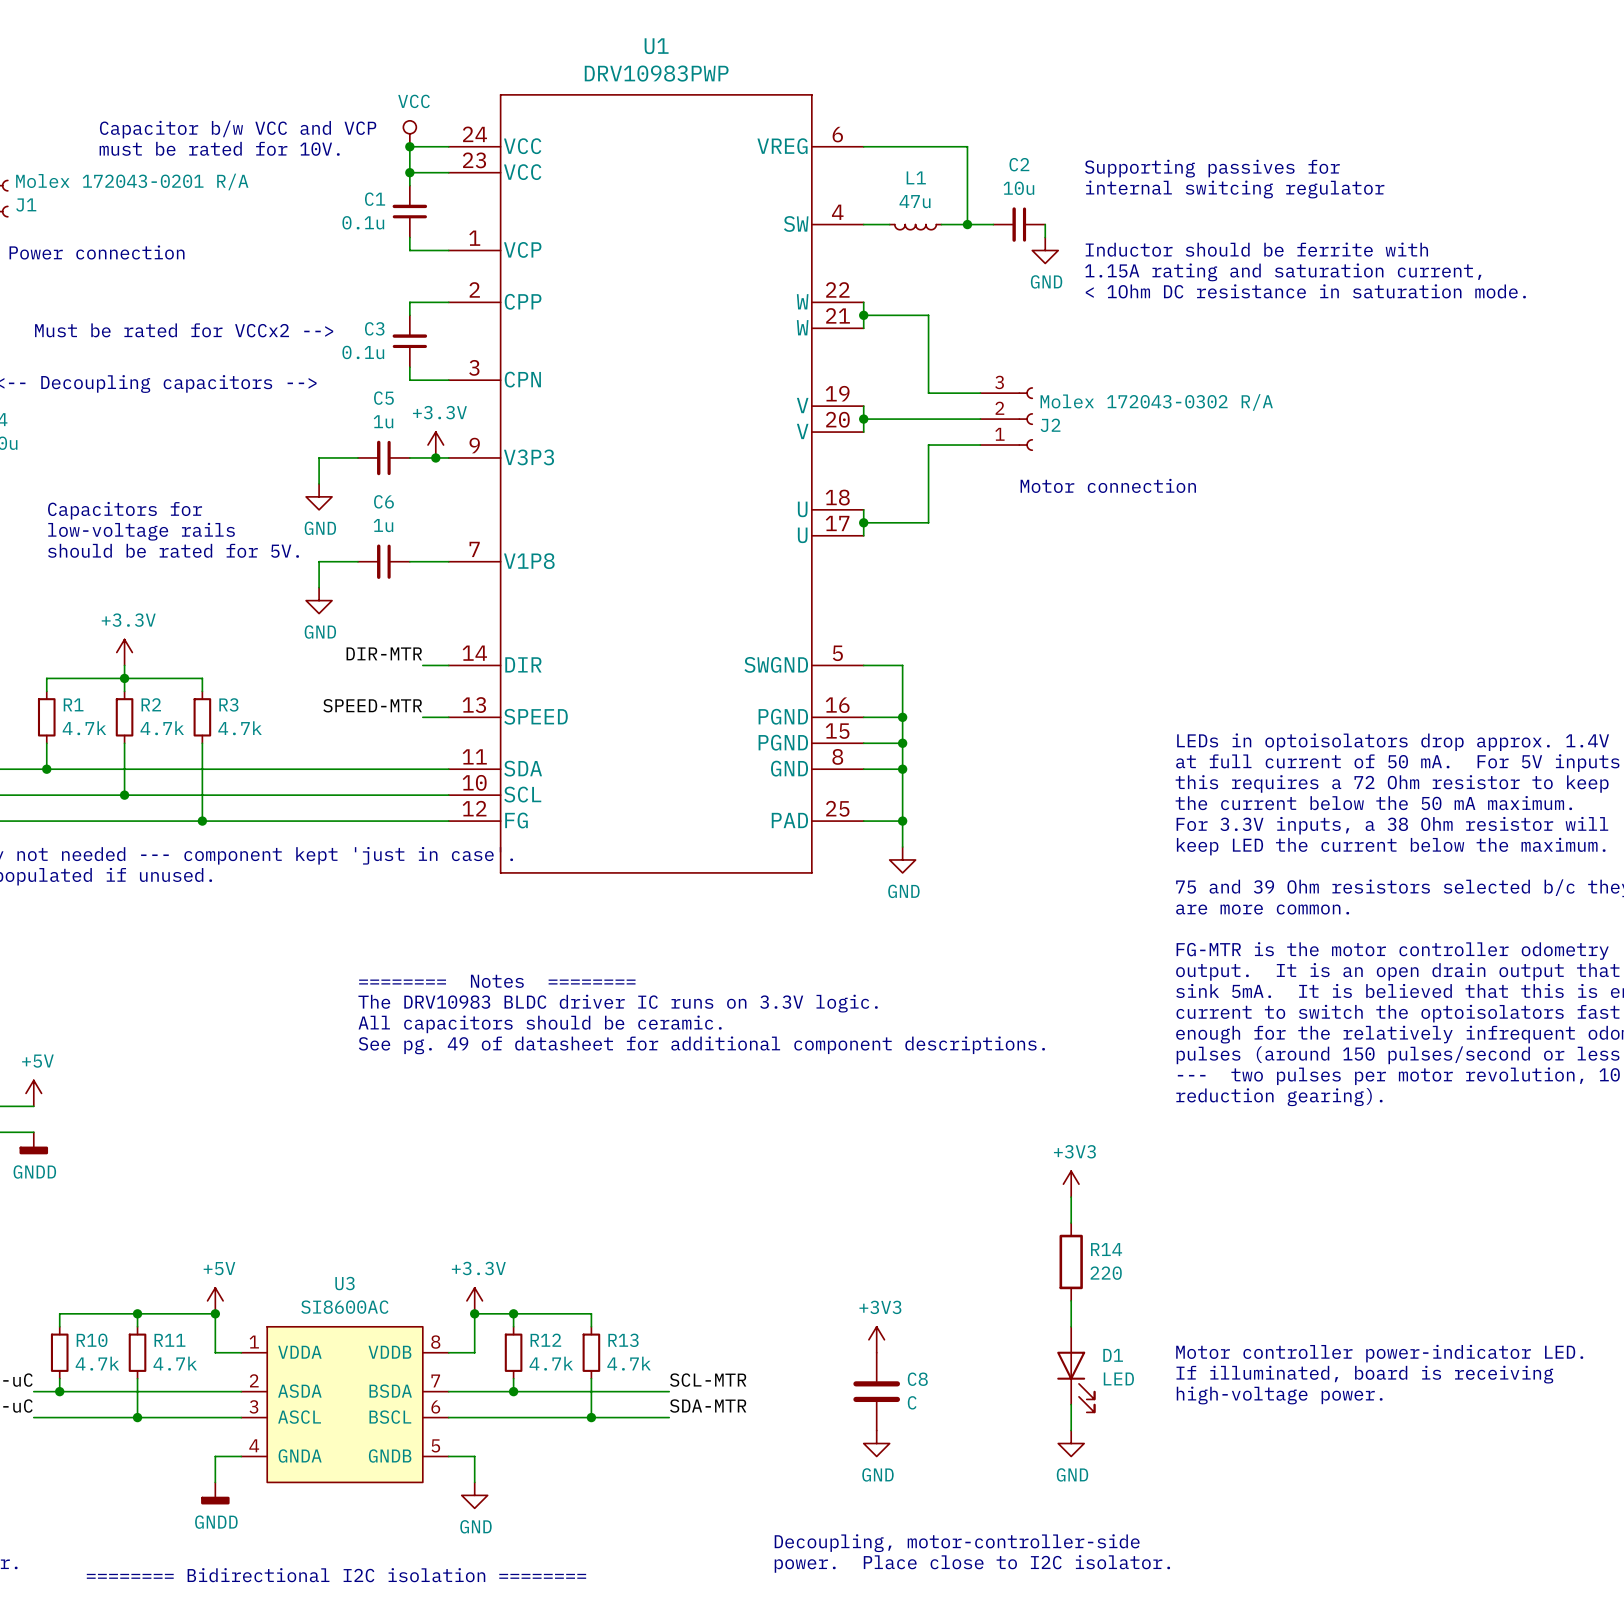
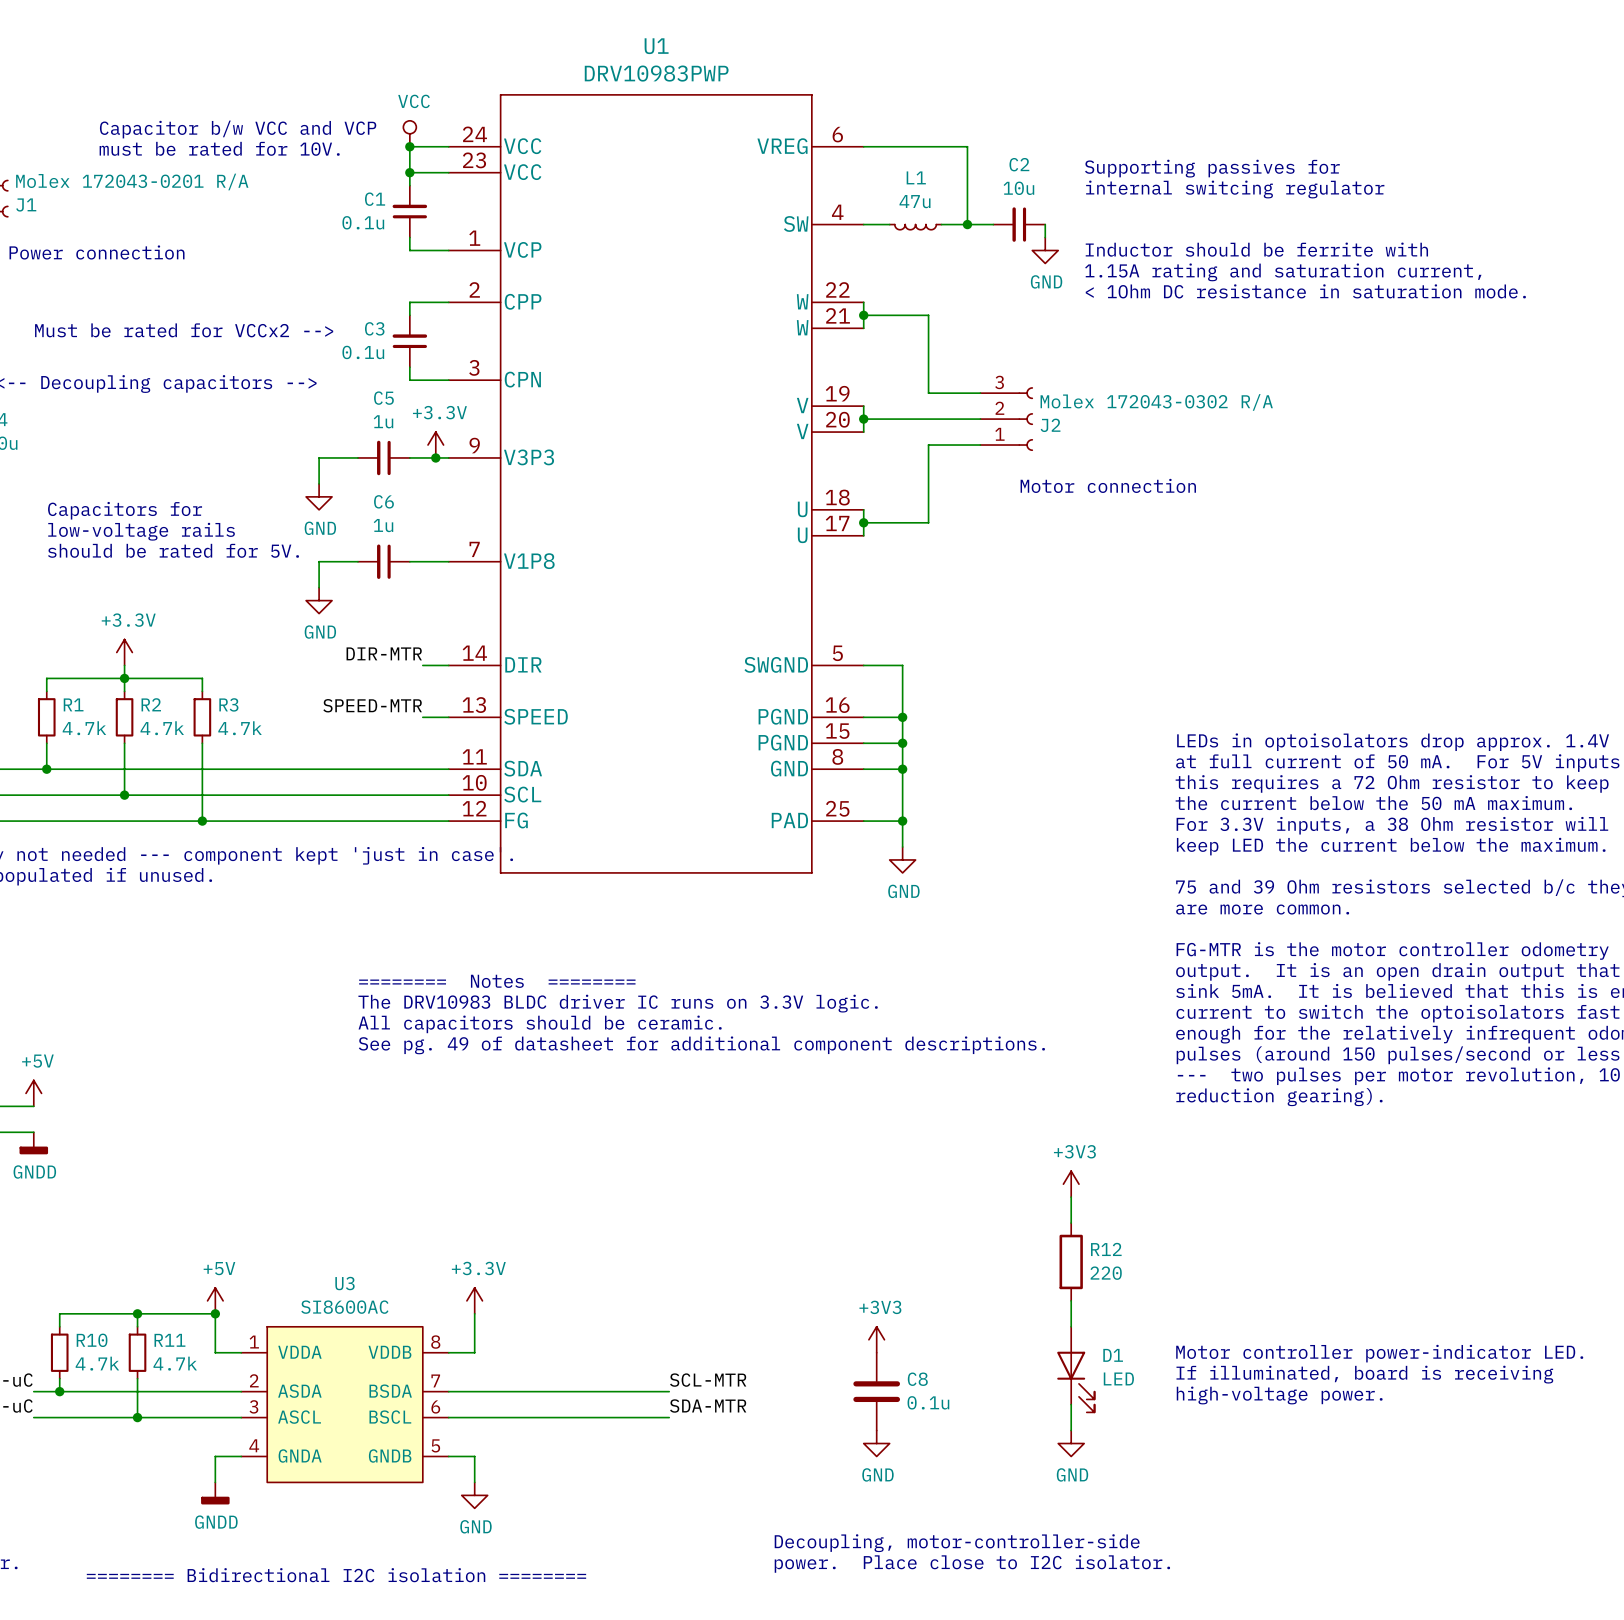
R14 name: R14 (1106, 1249) -> R12 (1106, 1249)
wire: (474, 1313) (591, 1313) (591, 1326) -> none
junction: (474, 1313) -> none
wire: (513, 1313) (513, 1326) -> none
junction: (513, 1313) -> none
R12: 4.7k (513, 1352) -> none
R13: 4.7k (591, 1352) -> none
wire: (513, 1378) (513, 1391) -> none
wire: (591, 1378) (591, 1417) -> none
junction: (513, 1391) -> none
C8 value: C (912, 1402) -> 0.1u (928, 1402)
junction: (591, 1417) -> none

